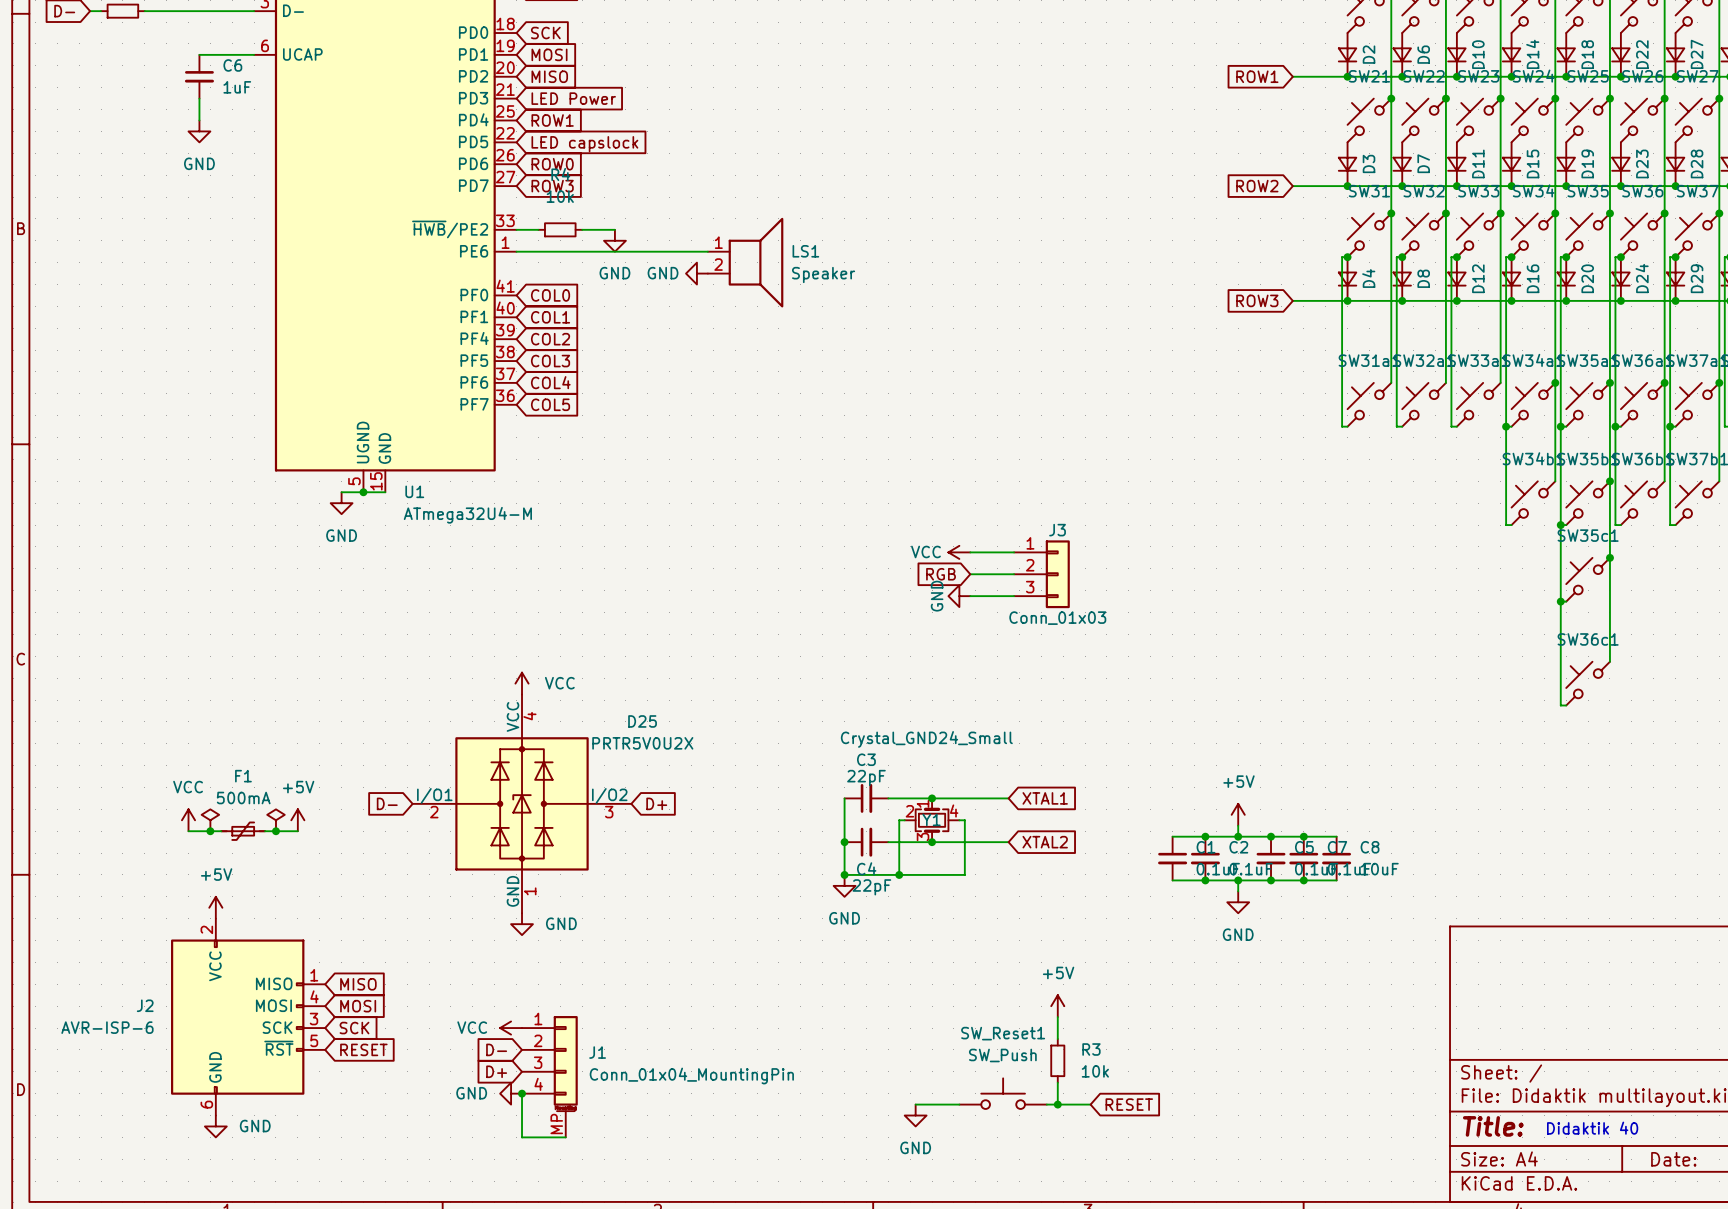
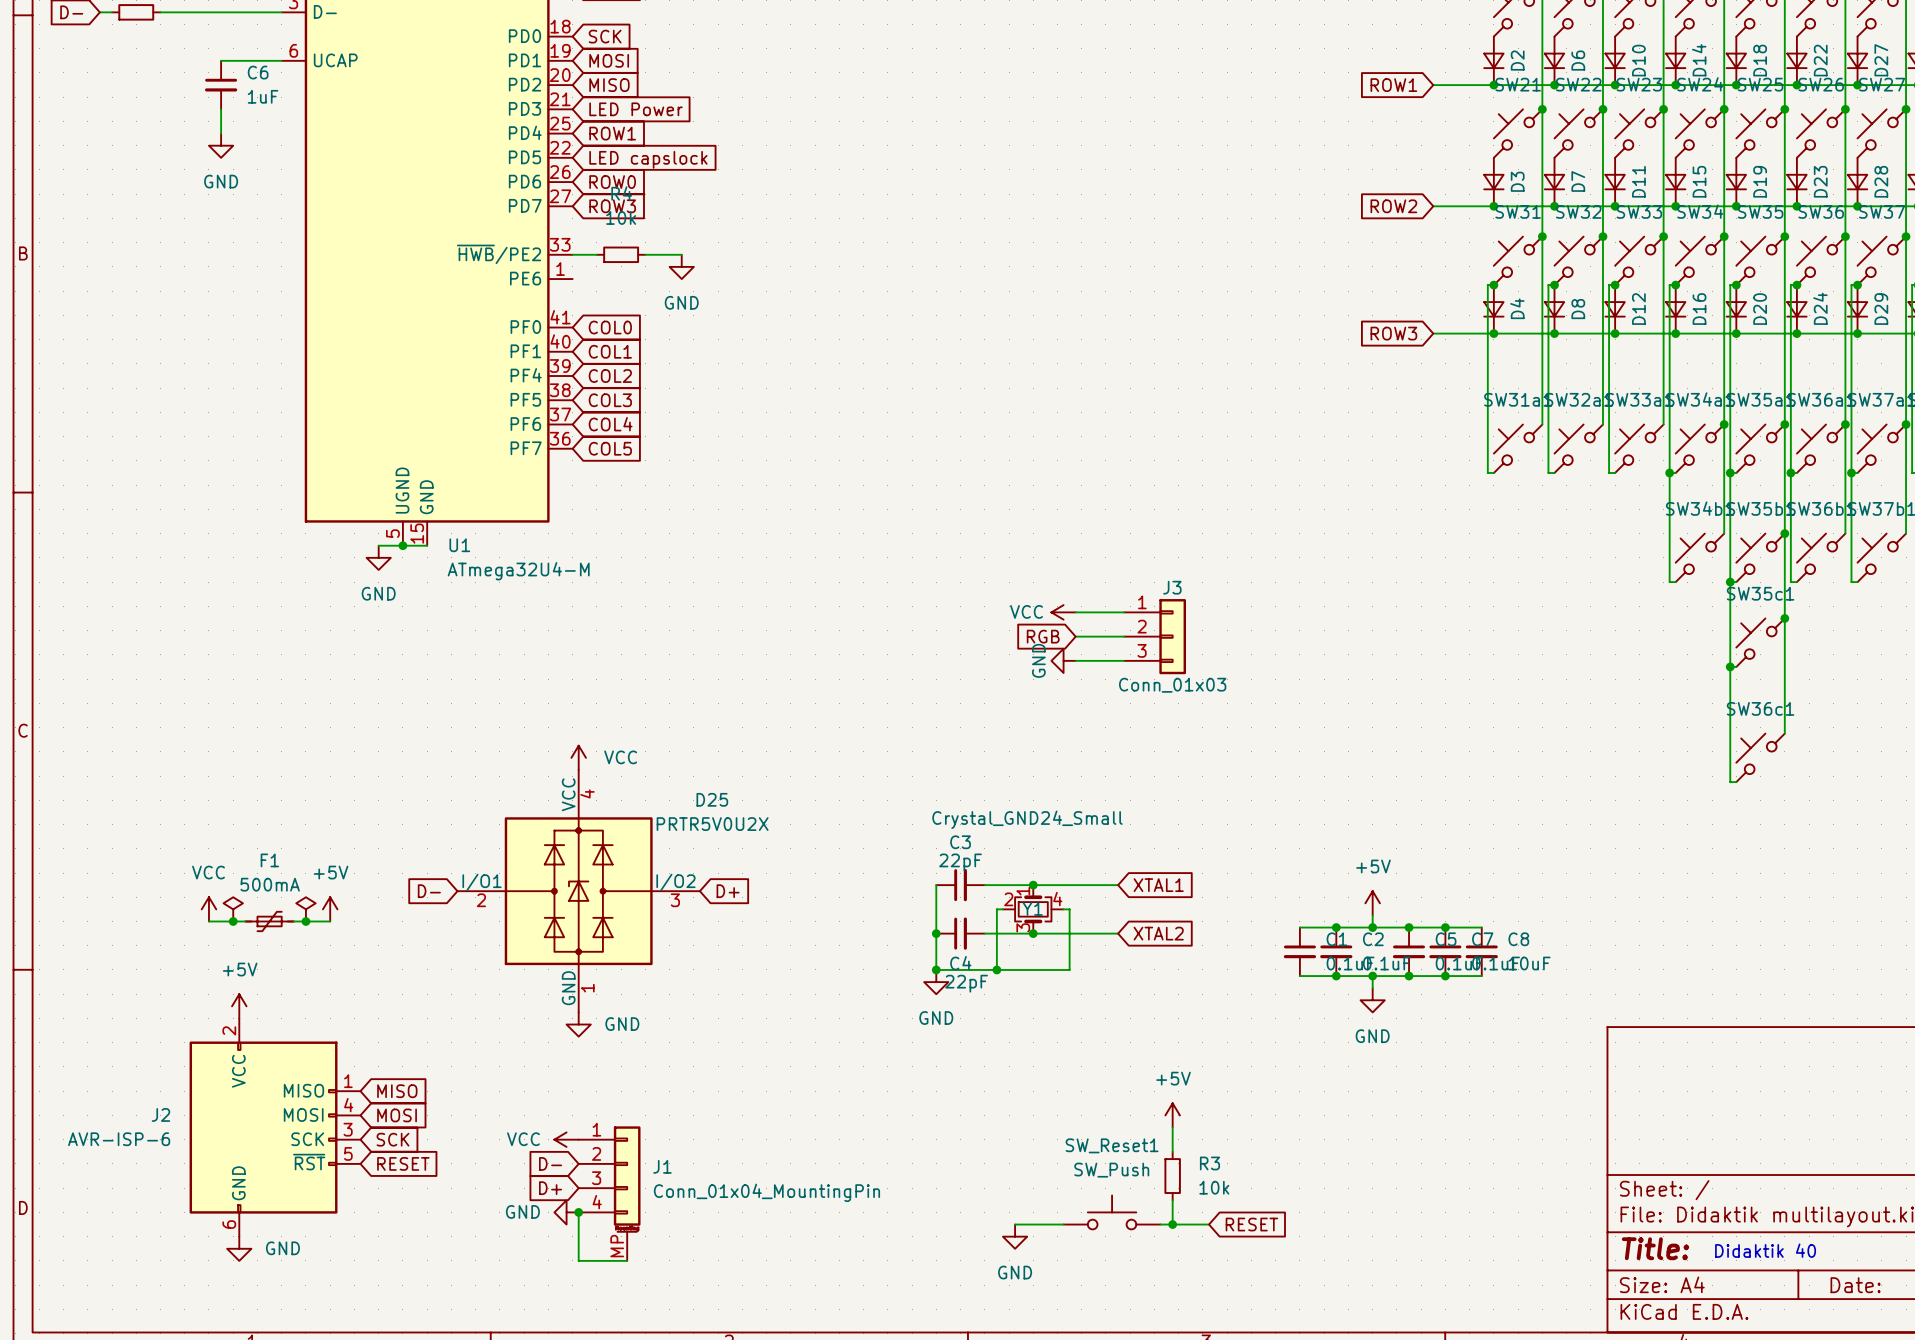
wire: (516, 251) (707, 251) -> none
LS1: Speaker (745, 262) -> none
power symbol: GND (696, 273) -> none

